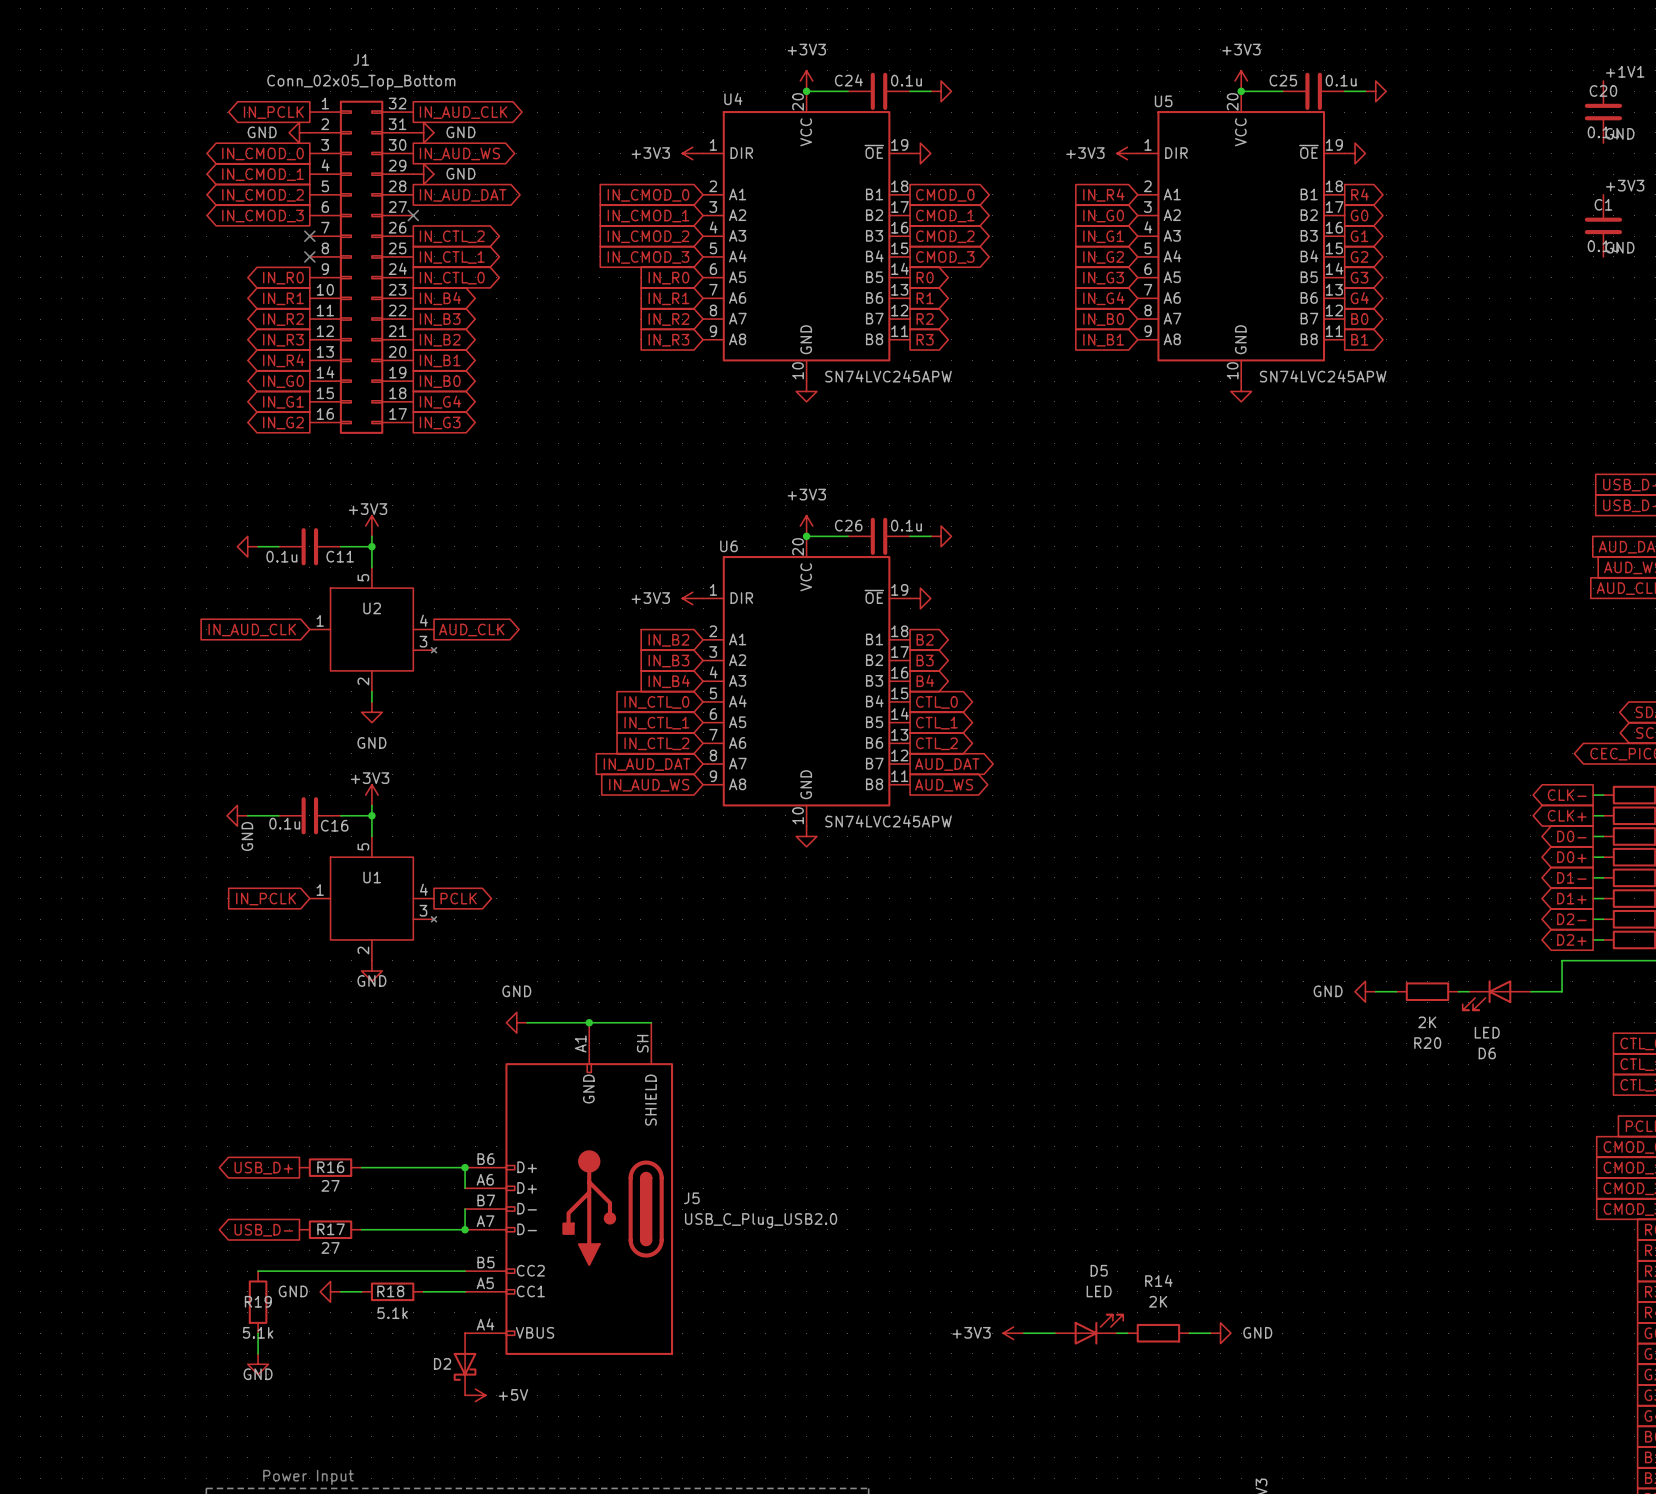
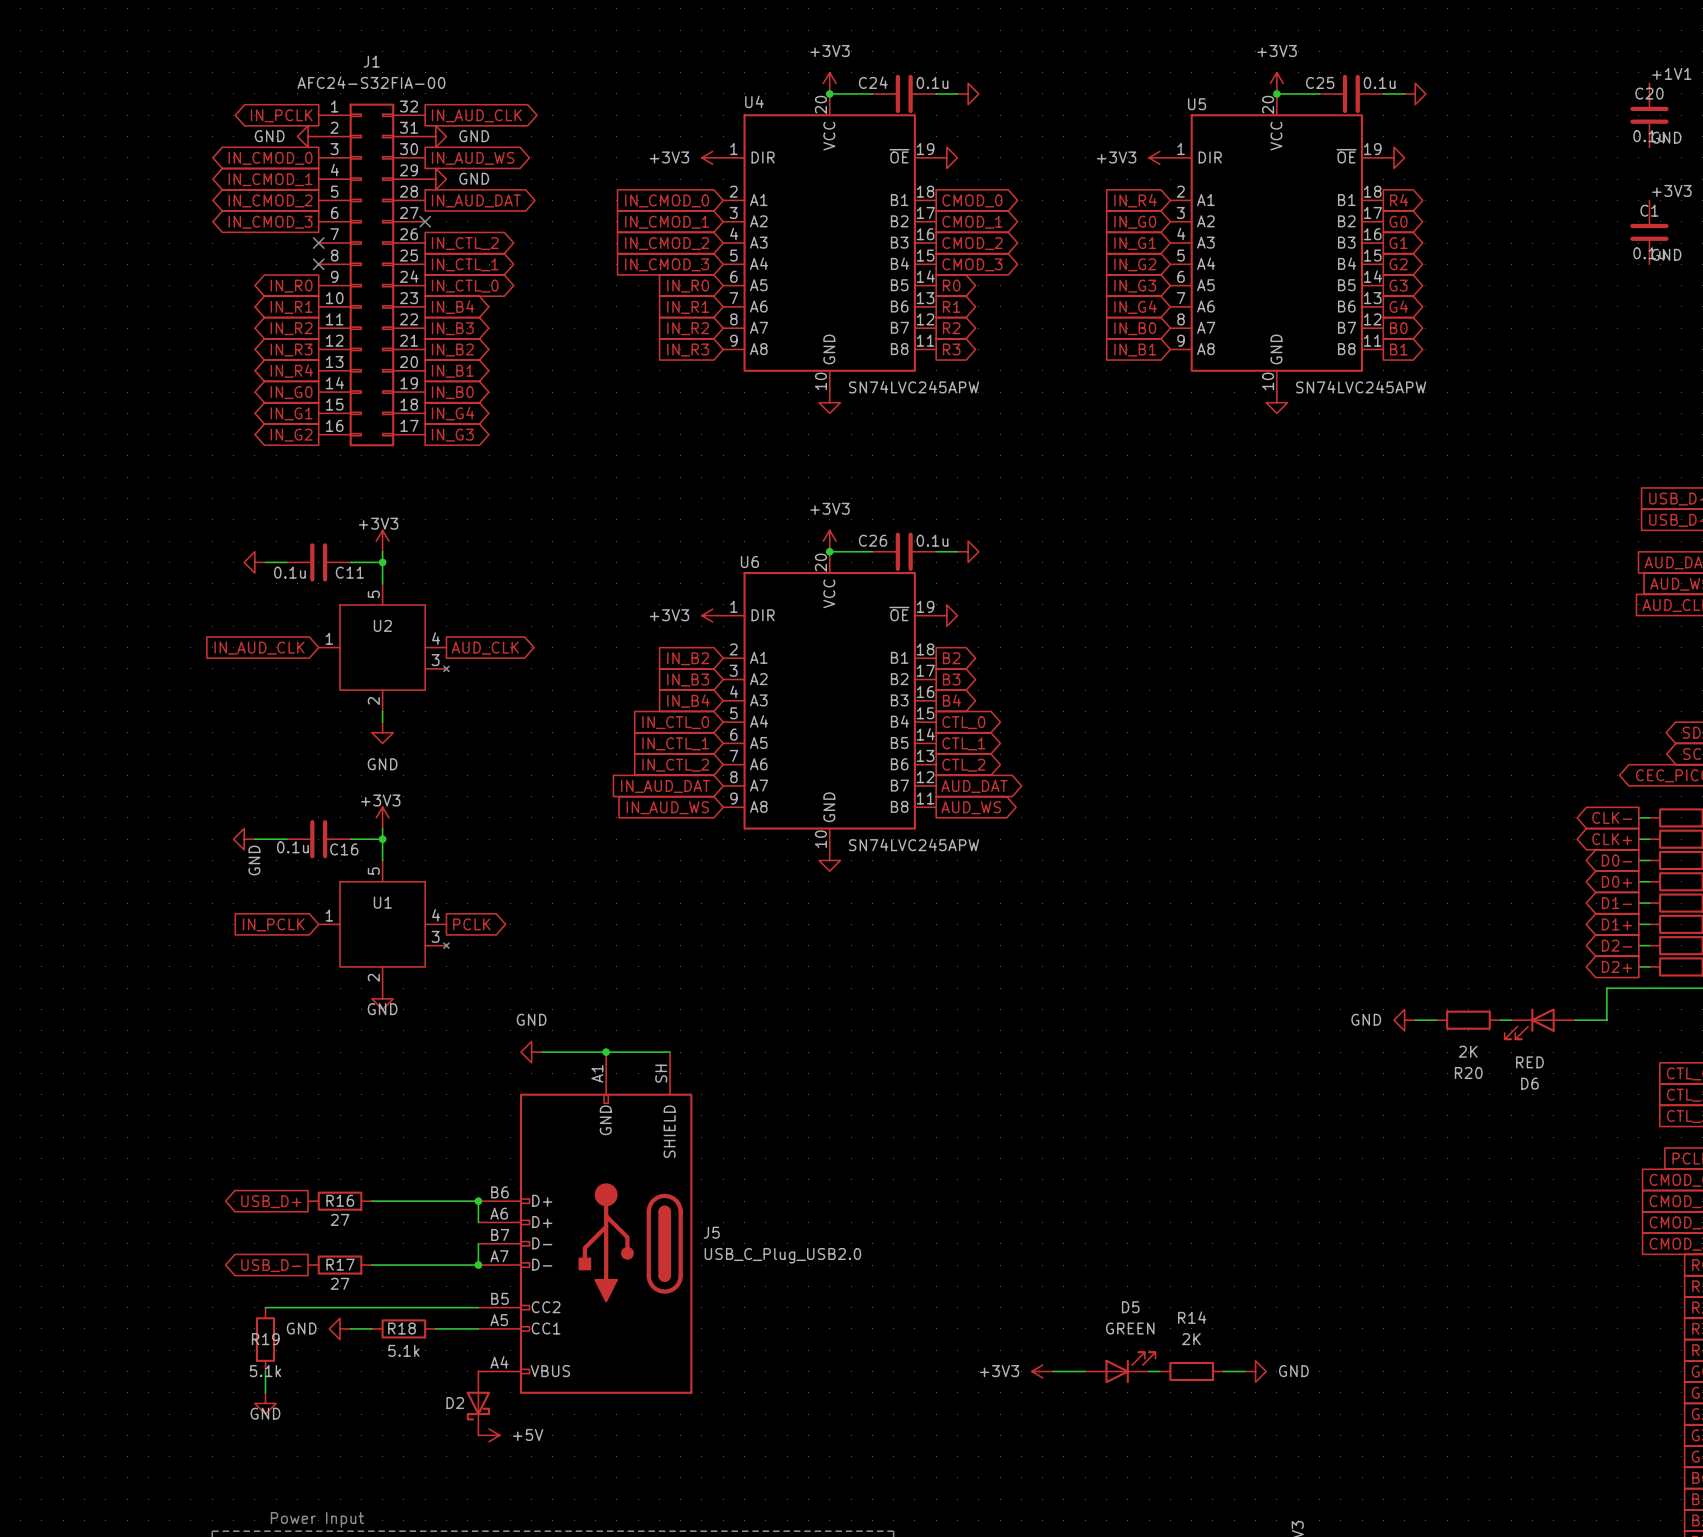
J1 value: Conn_02x05_Top_Bottom (361, 82) -> AFC24-S32FIA-00 (371, 82)
D6 value: LED (1487, 1032) -> RED (1529, 1062)
D5 value: LED (1099, 1291) -> GREEN (1130, 1328)

